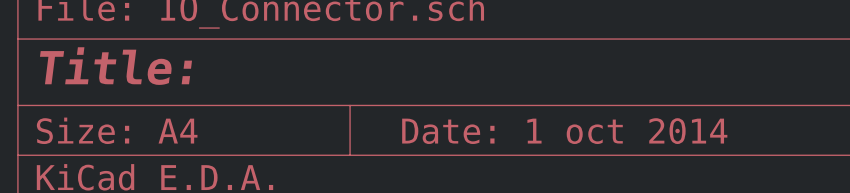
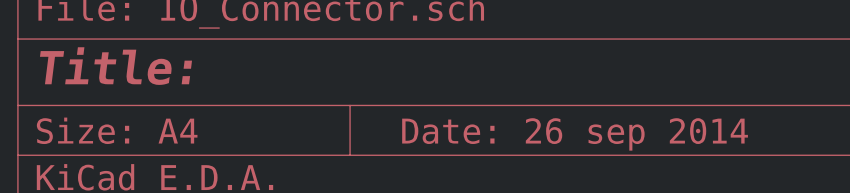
title block: Date: 1 oct 2014 (564, 131) -> Date: 26 sep 2014 (575, 134)

